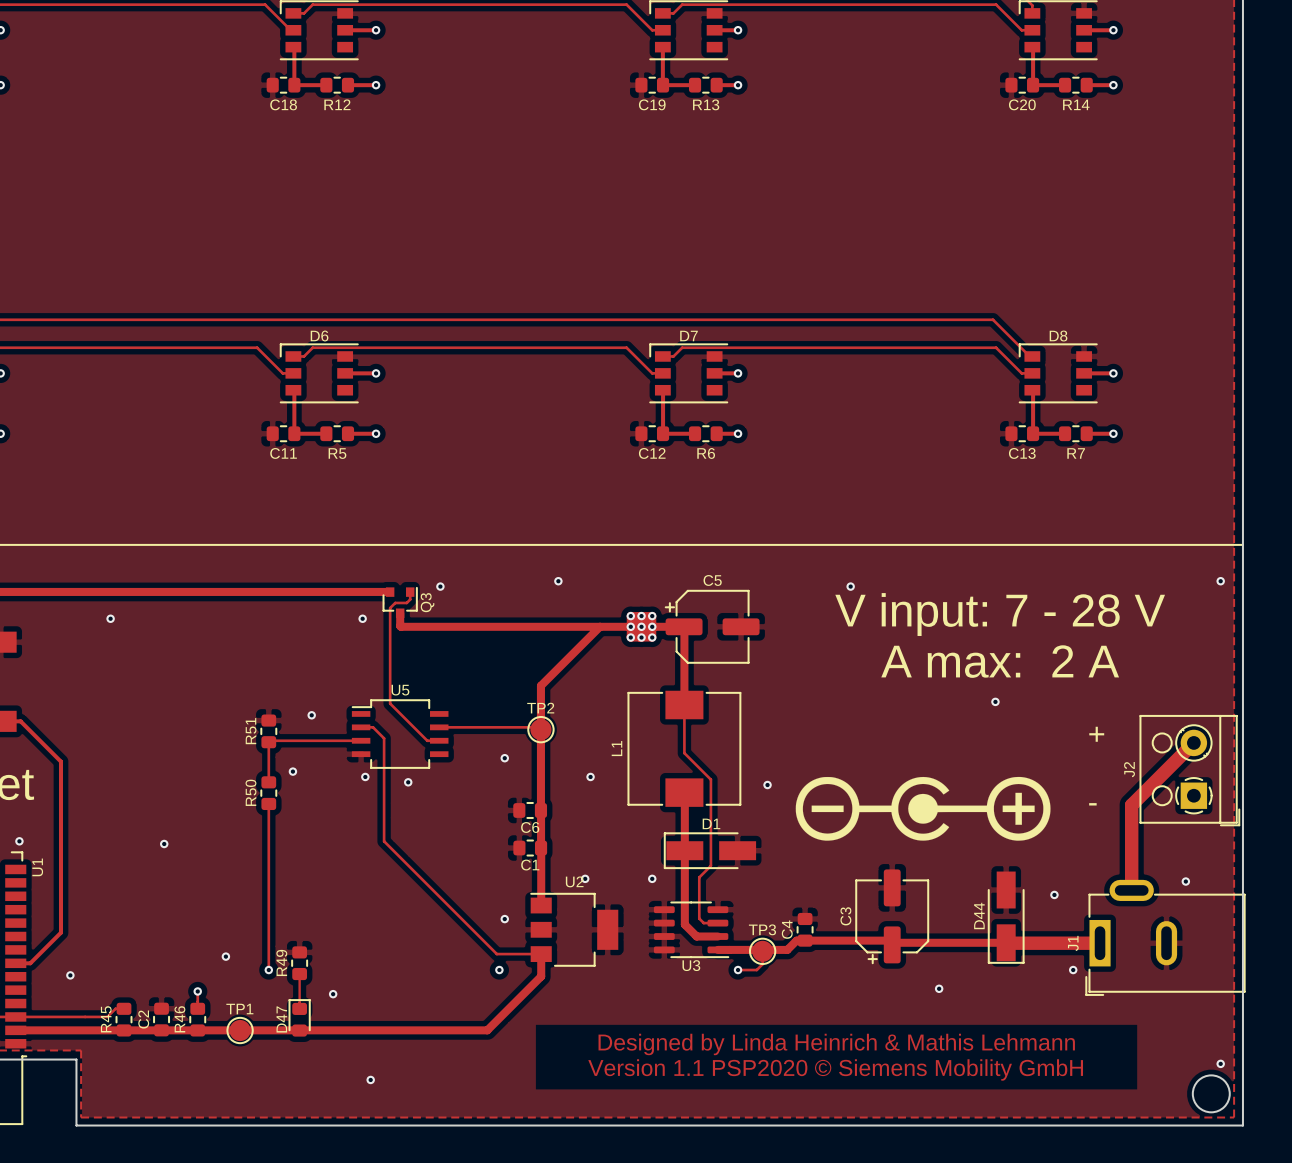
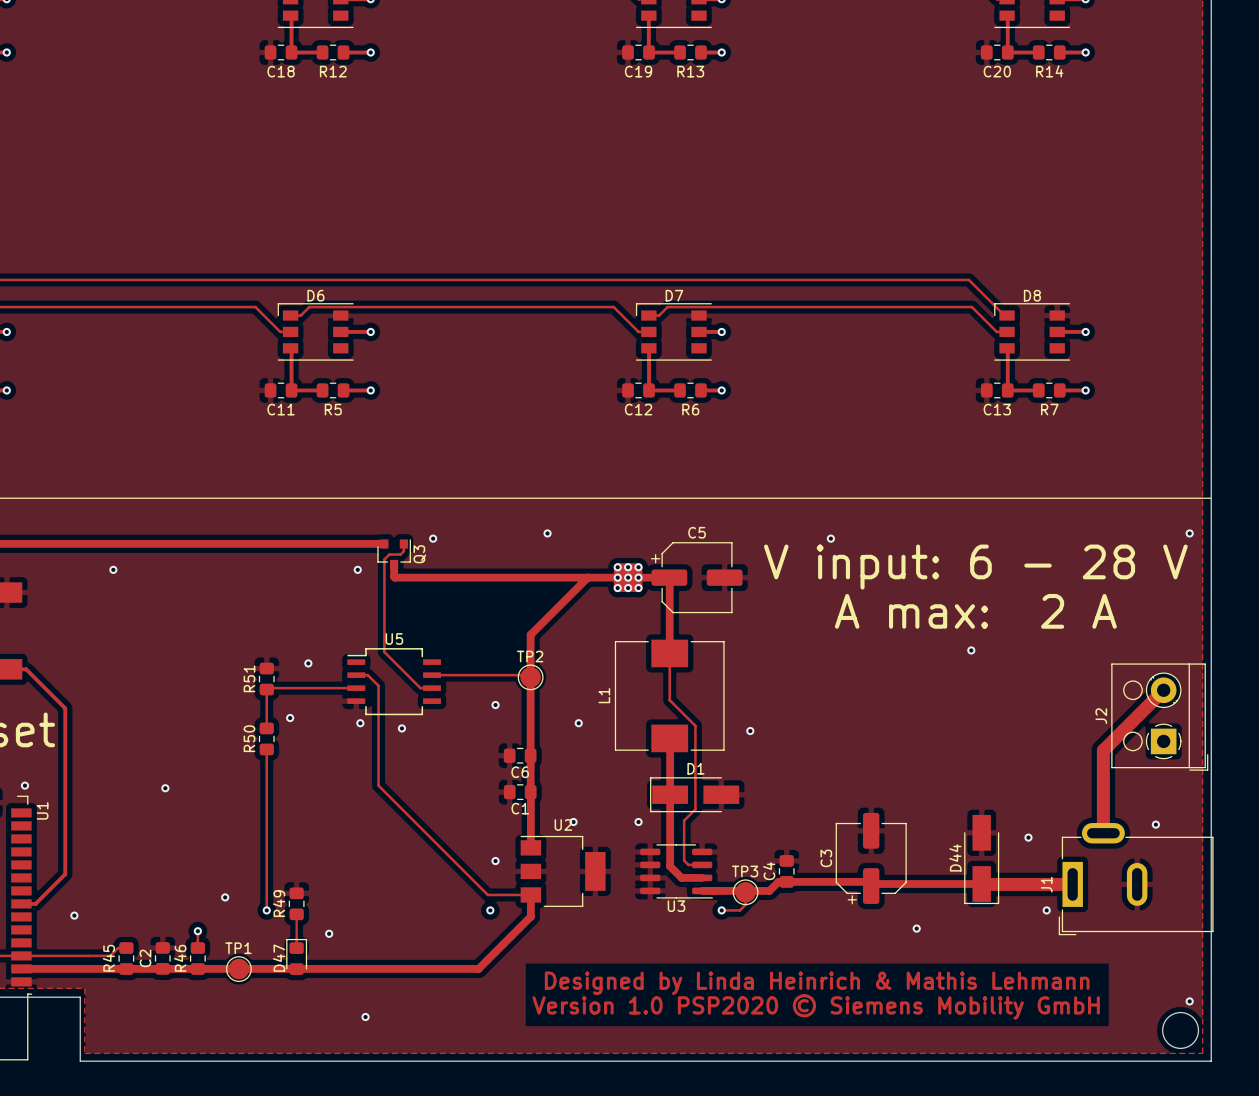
text: V input: 7 - 28 V (1000, 614) -> V input: 6 - 28 V (975, 567)
text: + (1096, 734) -> none
drawing: [795, 776, 1051, 841] -> none
text: - (1092, 804) -> none
text: Version 1.1 PSP2020 © Siemens Mobility GmbH (835, 1069) -> Version 1.0 PSP2020 © Siemens Mobility GmbH (816, 1006)

